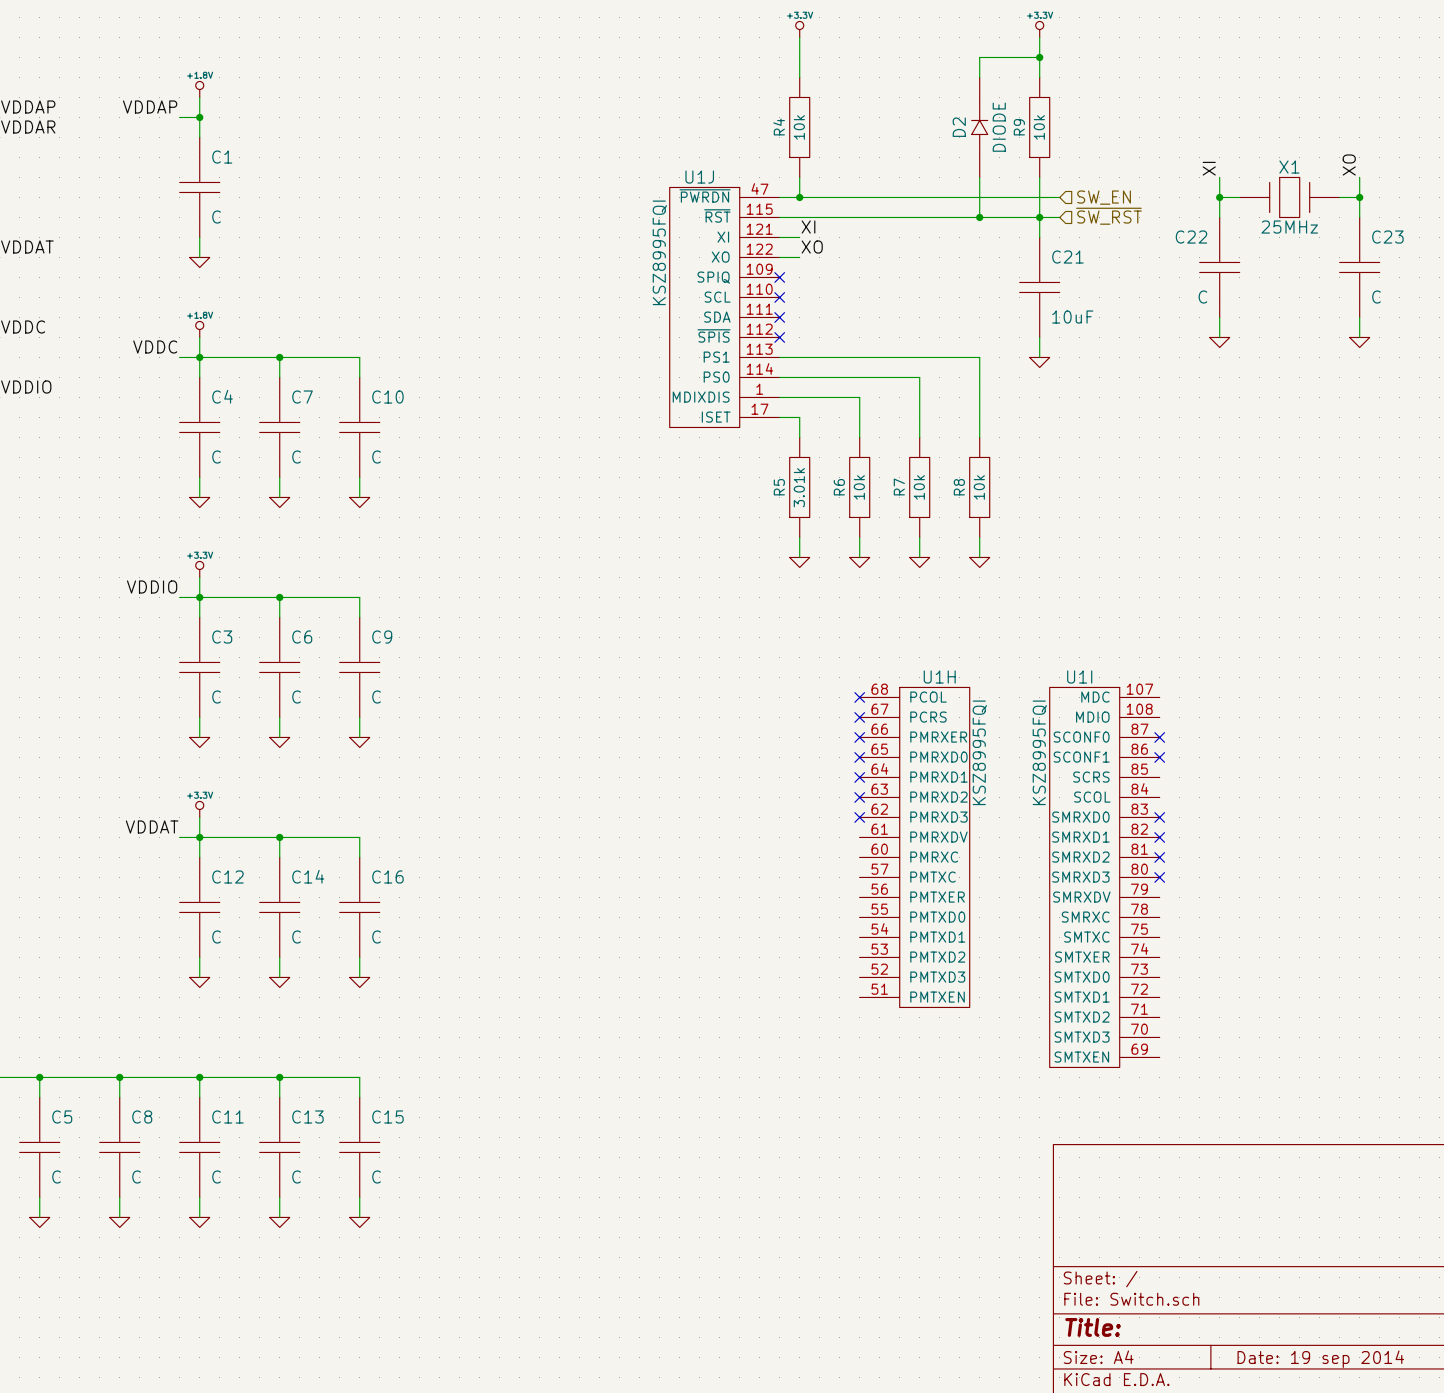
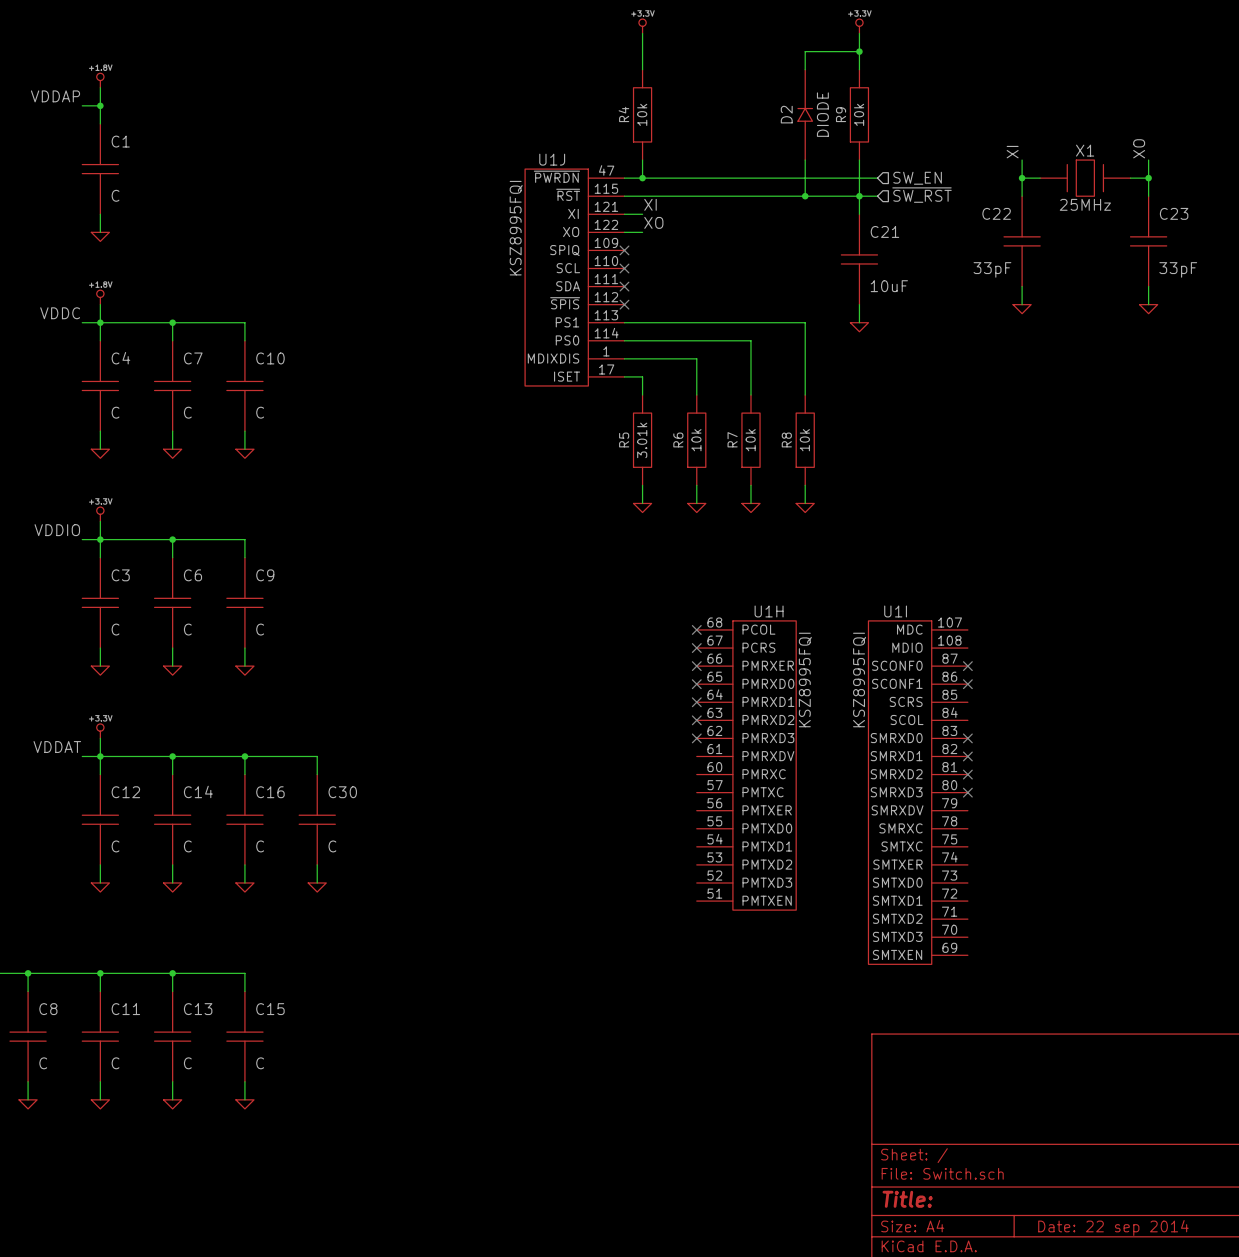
C22 value: C (1202, 297) -> 33pF (992, 269)
C23 value: C (1376, 297) -> 33pF (1178, 269)
wire: none -> (244, 756) (317, 756) (317, 774)
junction: none -> (244, 756)
C30: none -> C (317, 819)
wire: none -> (317, 864) (317, 882)
power symbol: none -> (317, 887)
title block: Date: 19 sep 2014 (1320, 1359) -> Date: 22 sep 2014 (1113, 1227)

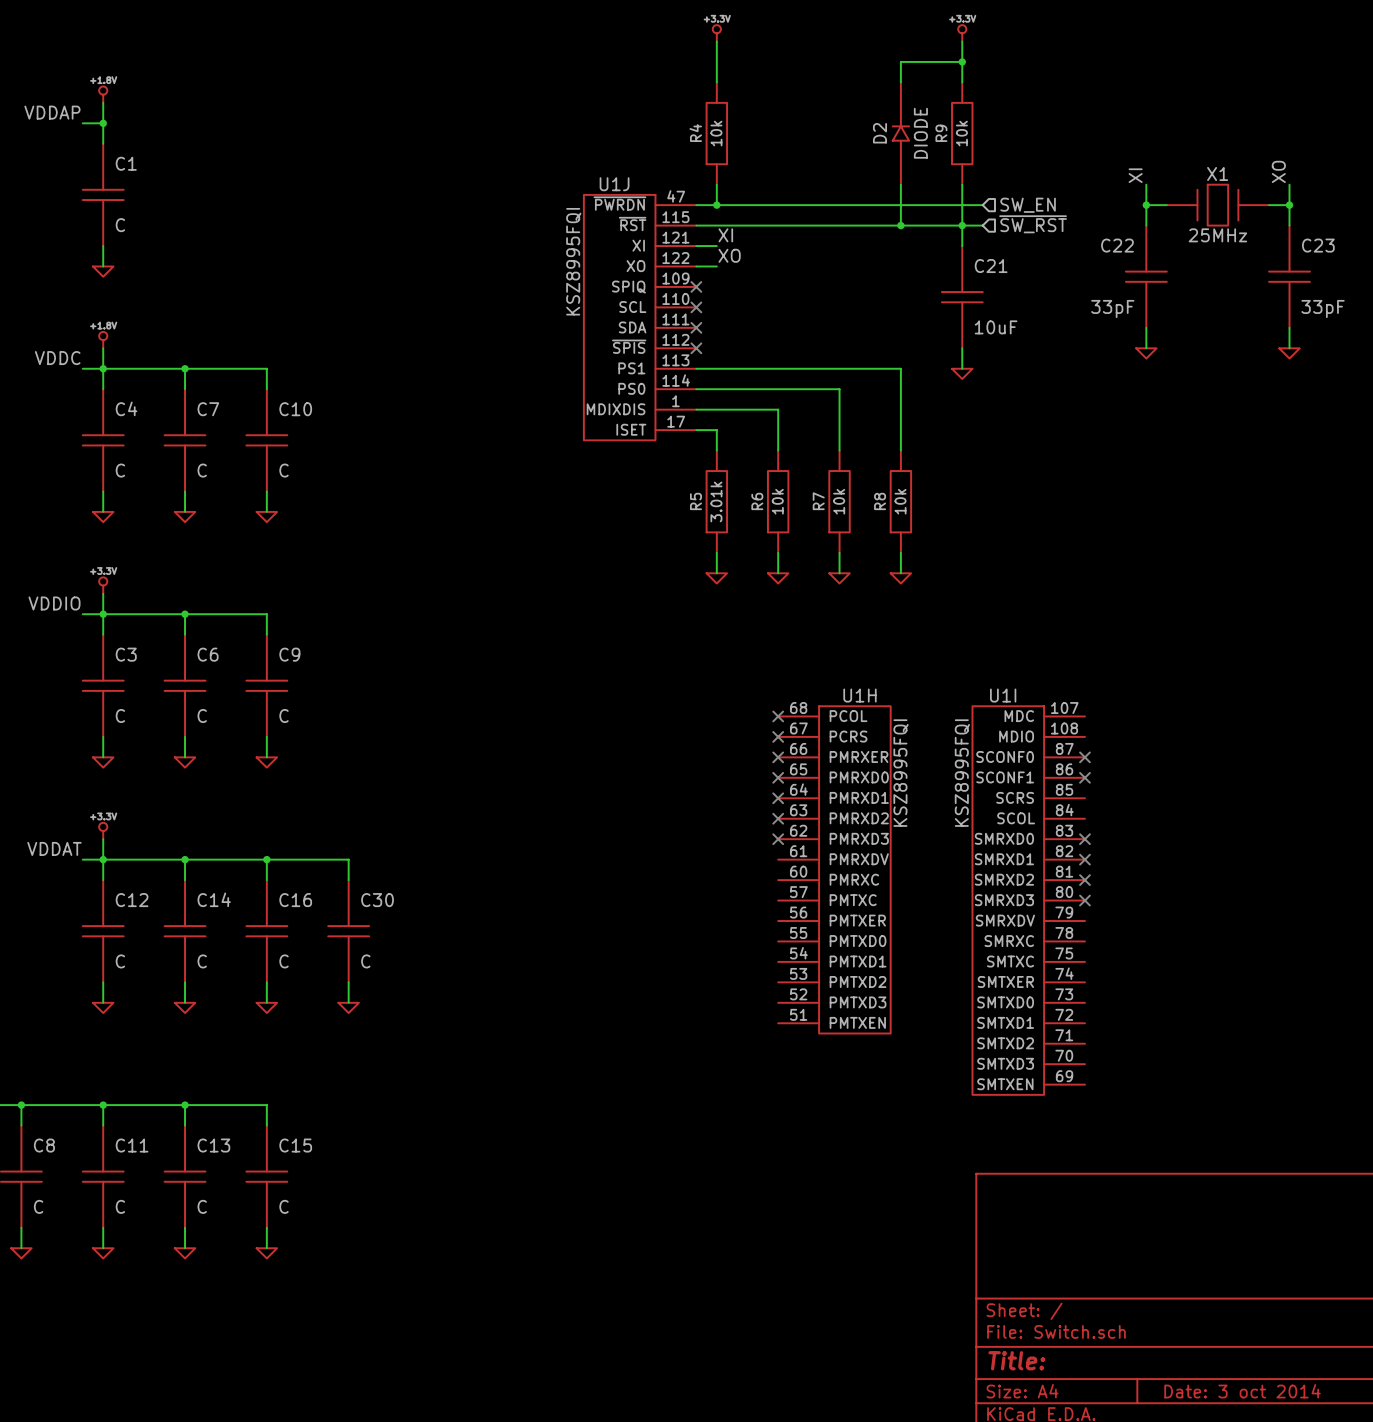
title block: Date: 22 sep 2014 (1113, 1227) -> Date: 3 oct 2014 (1242, 1391)

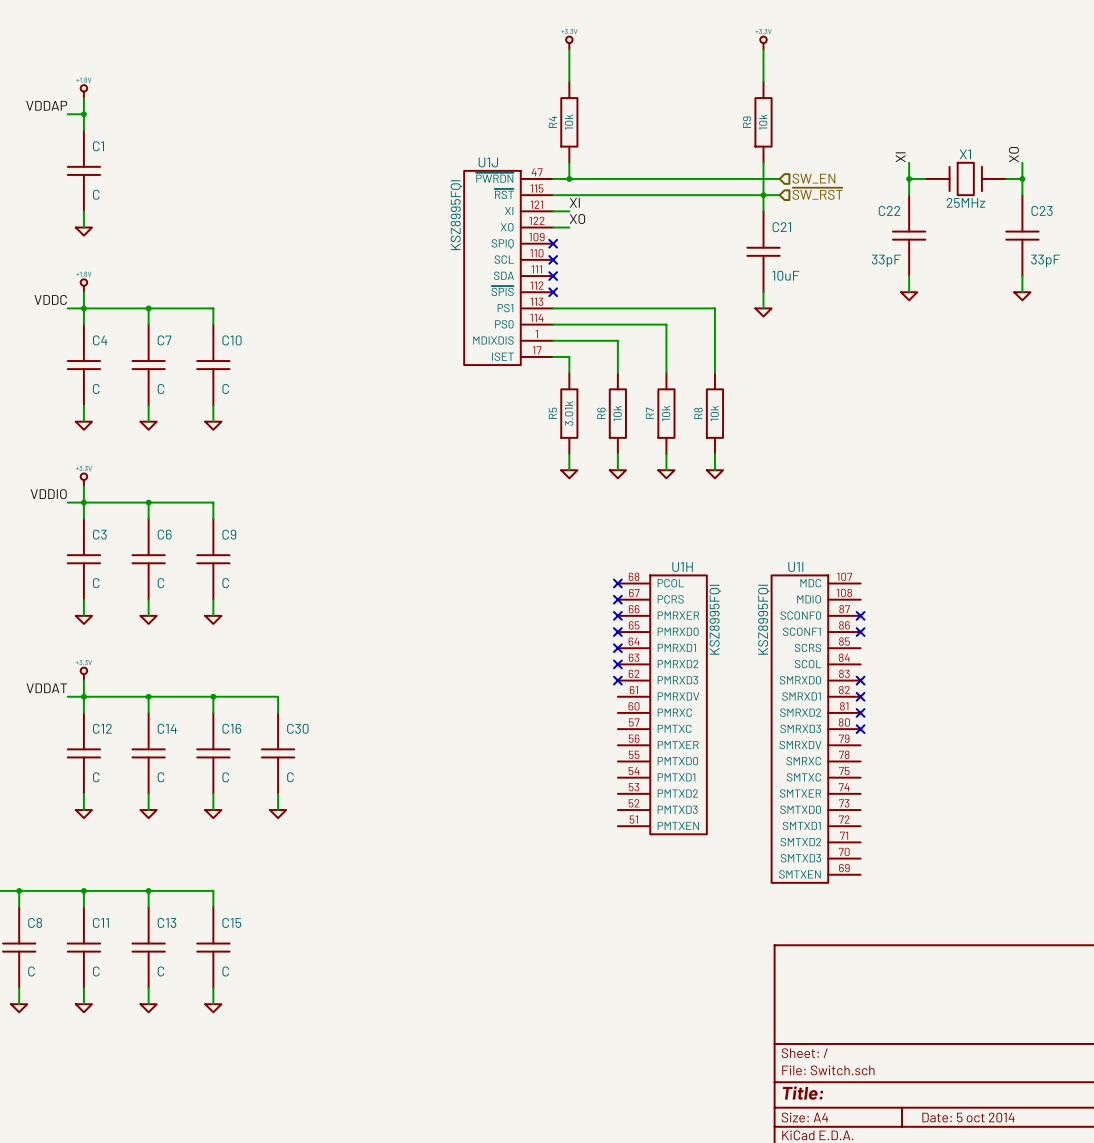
wire: (962, 61) (900, 61) (900, 82) -> none
junction: (962, 61) -> none
D2: DIODE (900, 133) -> none
wire: (900, 184) (900, 225) -> none
junction: (900, 225) -> none
title block: Date: 3 oct 2014 (1242, 1391) -> Date: 5 oct 2014 (968, 1117)

